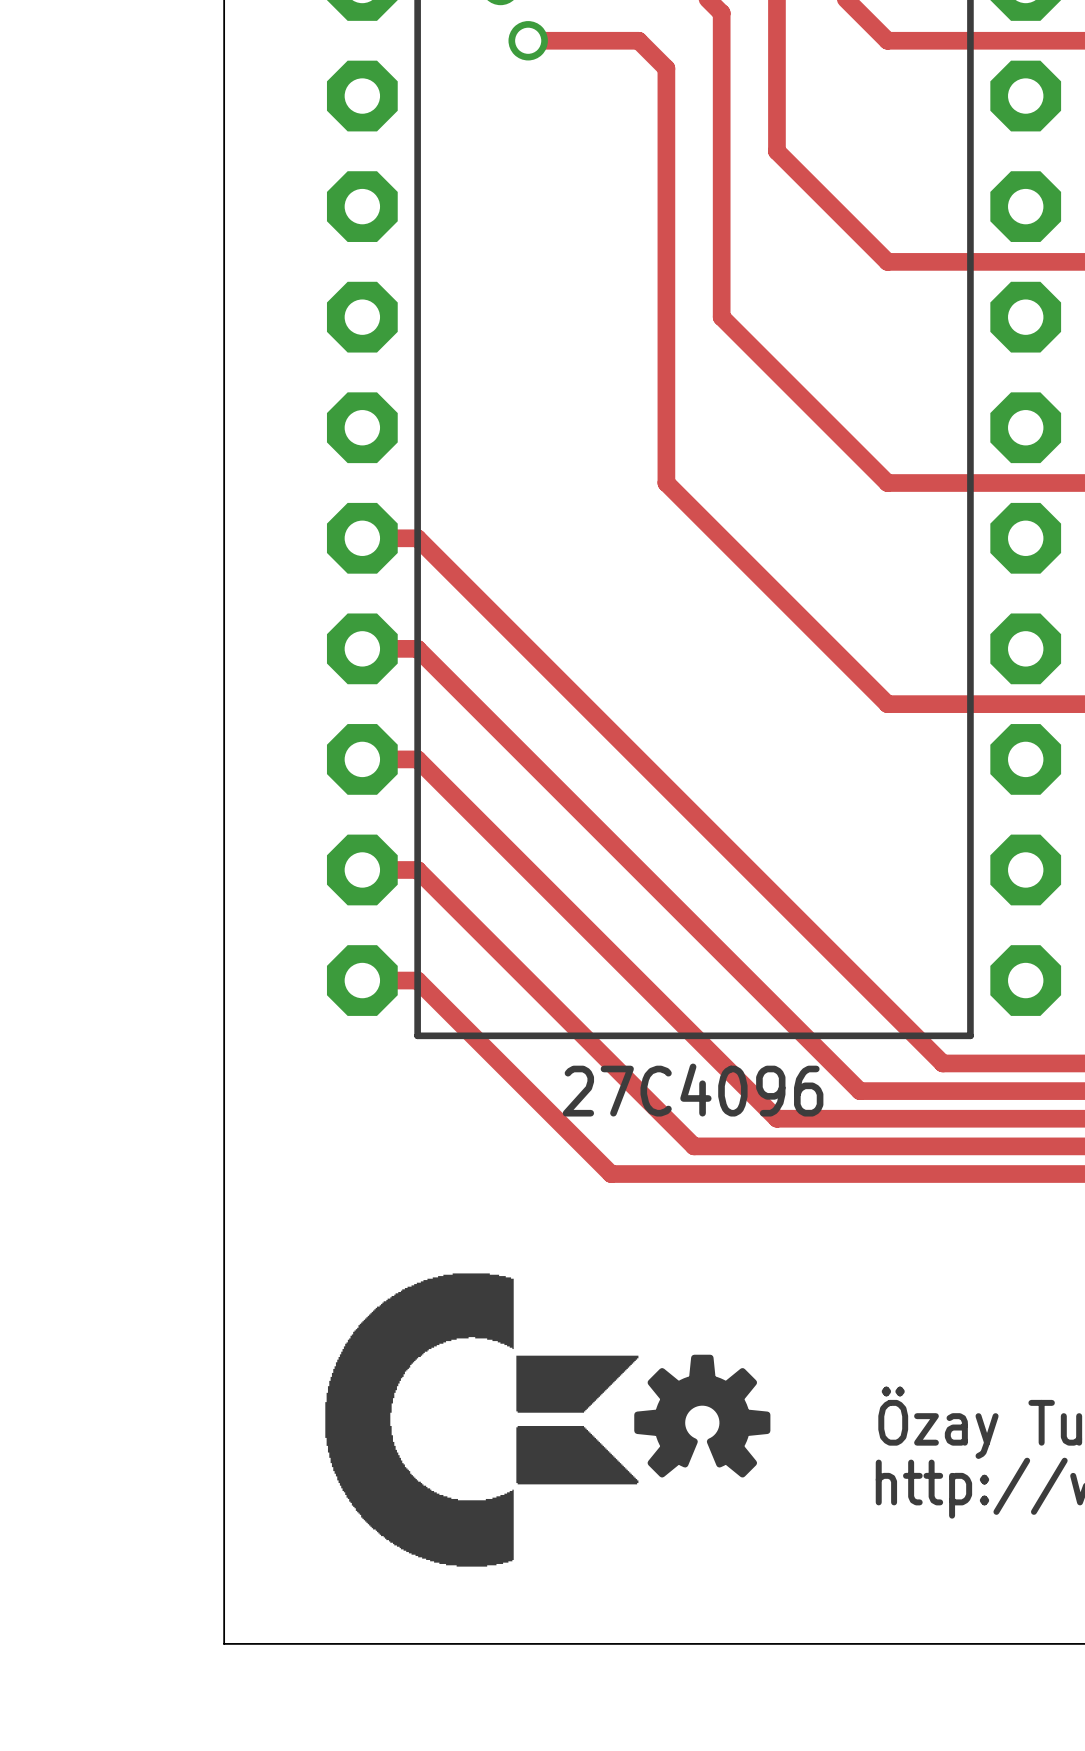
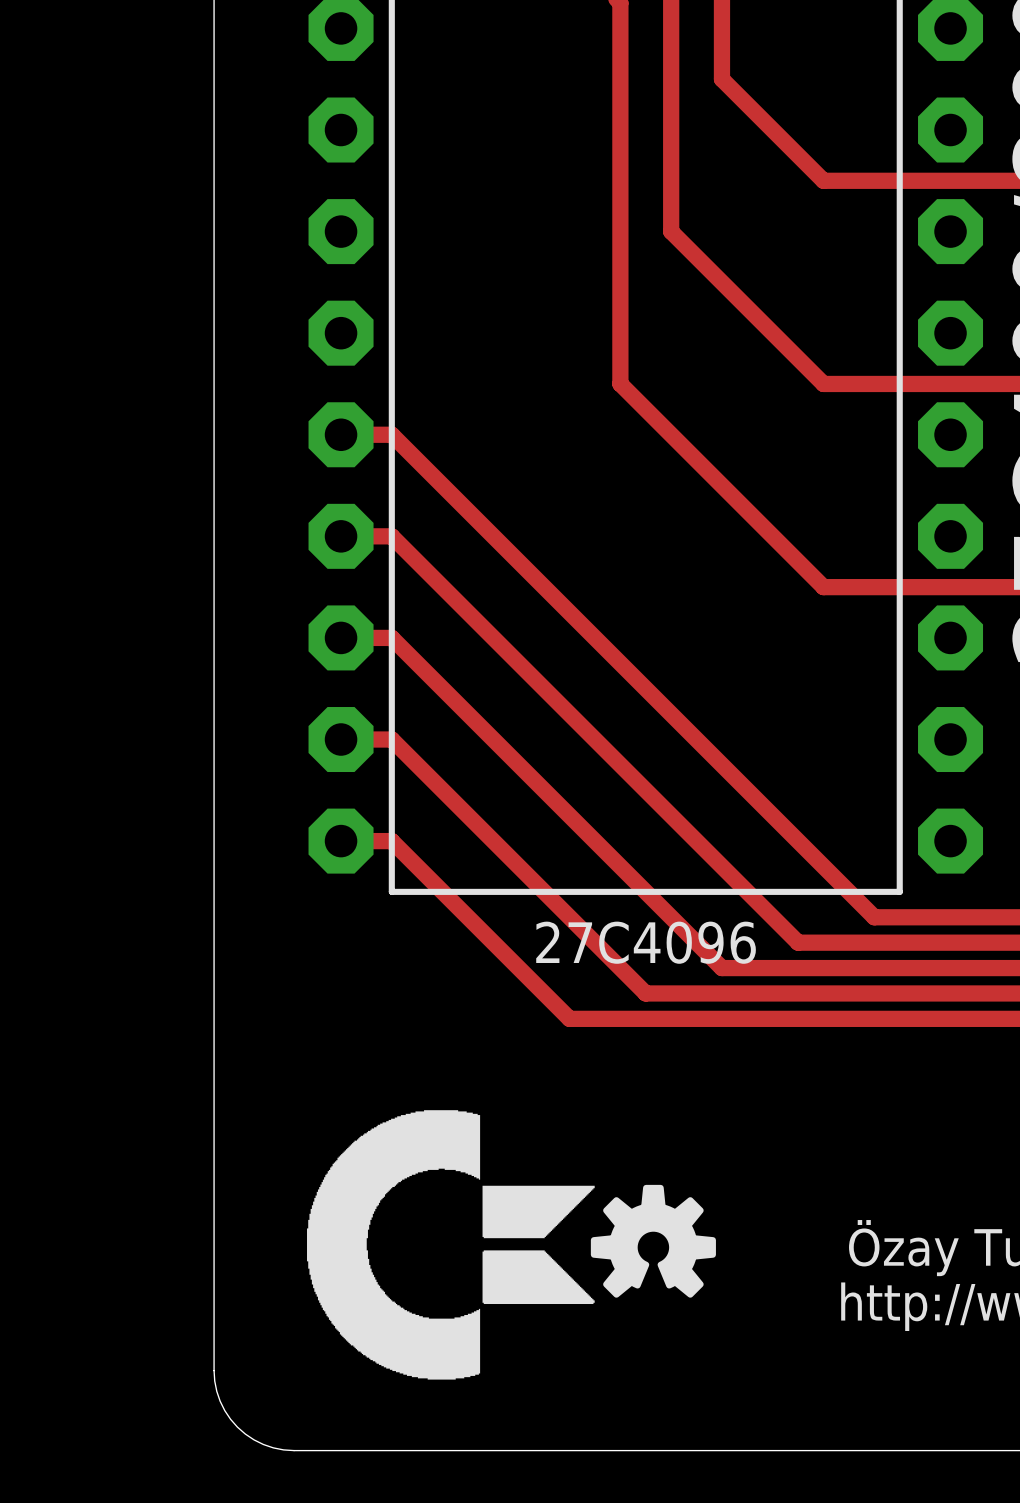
board edge: (224, 1556) (224, 1643) (311, 1643) -> (214, 1370) (220, 1401) (237, 1427) (263, 1444) (294, 1450)

